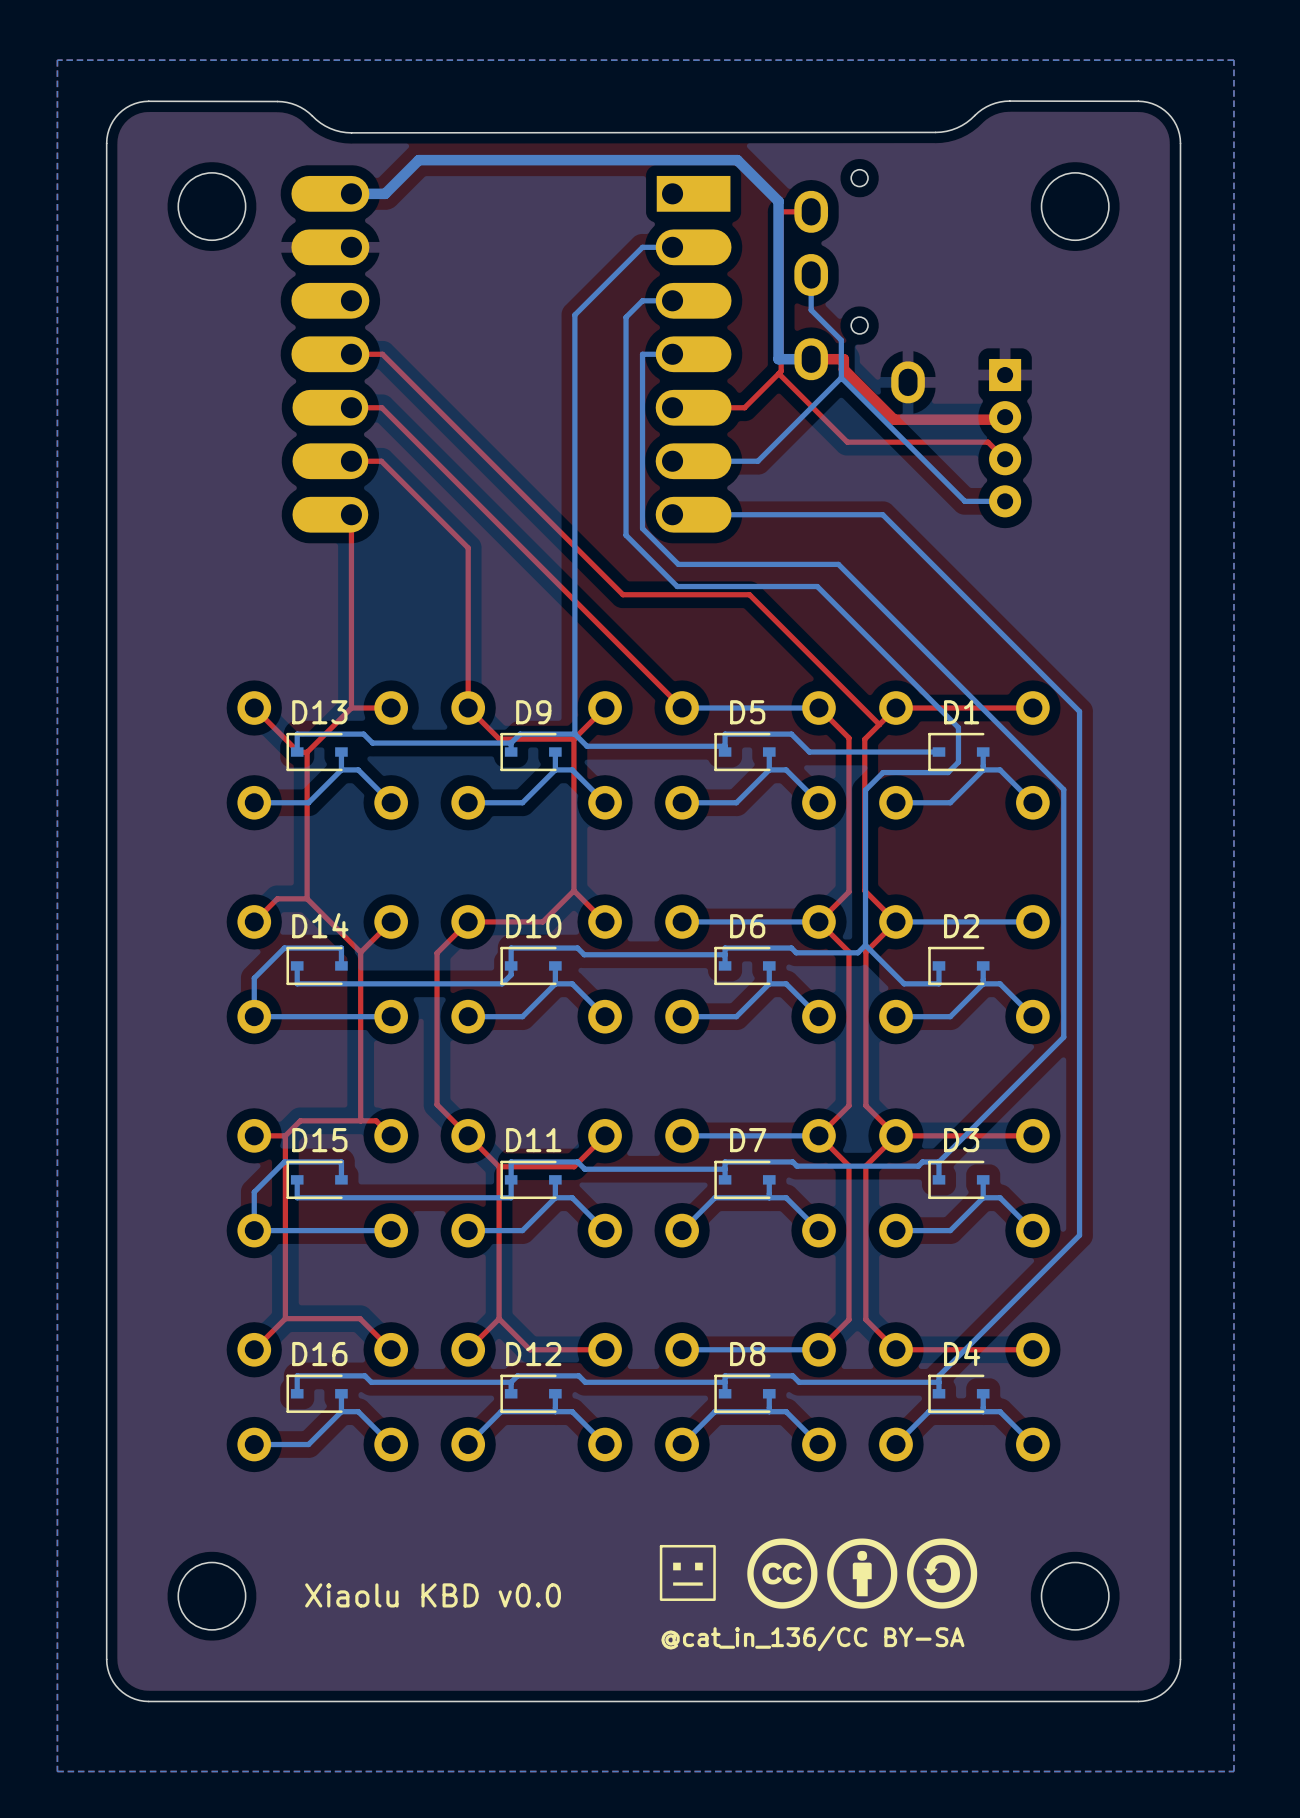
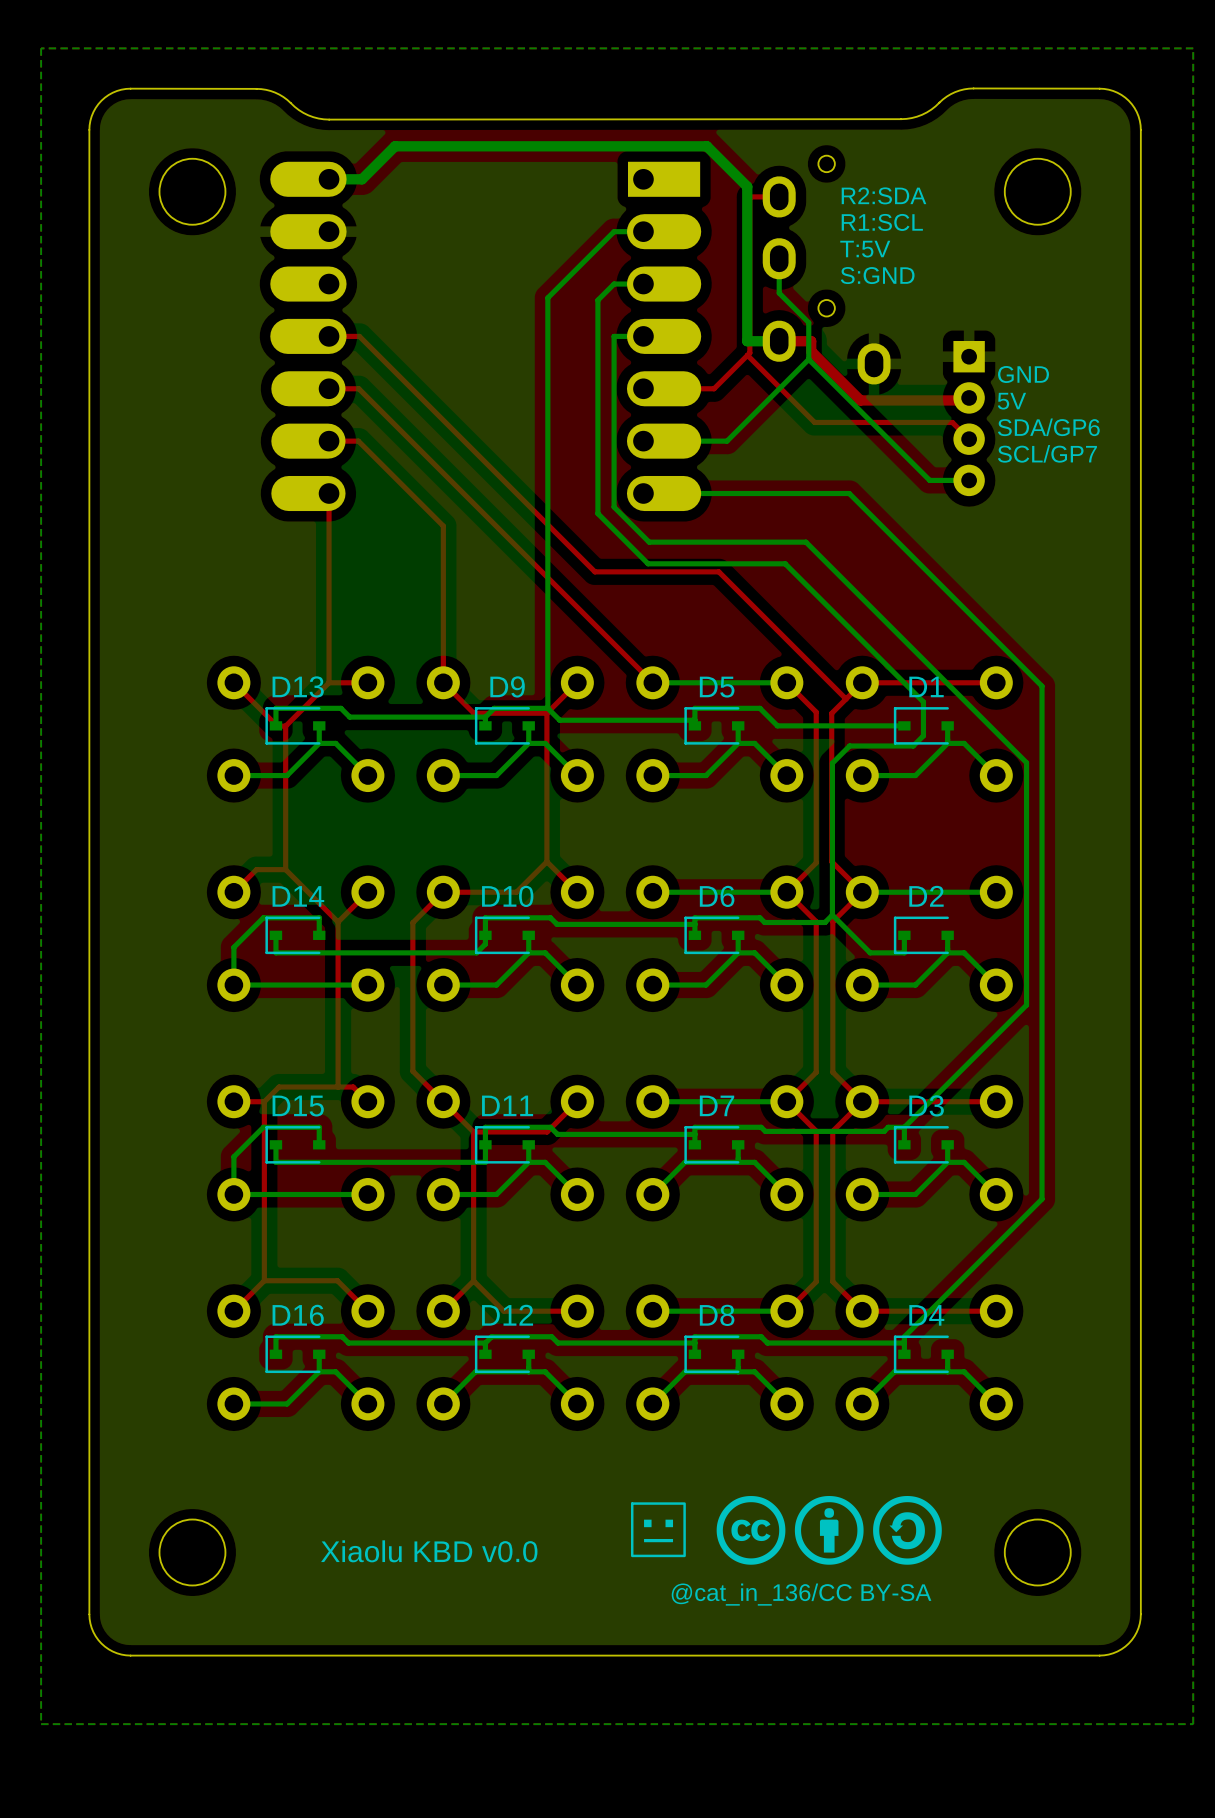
text: none -> R2:SDA (884, 195)
text: none -> R1:SCL (882, 222)
text: none -> T:5V (865, 249)
text: none -> S:GND (877, 275)
text: none -> GND (1023, 374)
text: none -> 5V (1011, 401)
text: none -> SDA/GP6 (1048, 427)
text: none -> SCL/GP7 (1047, 453)

